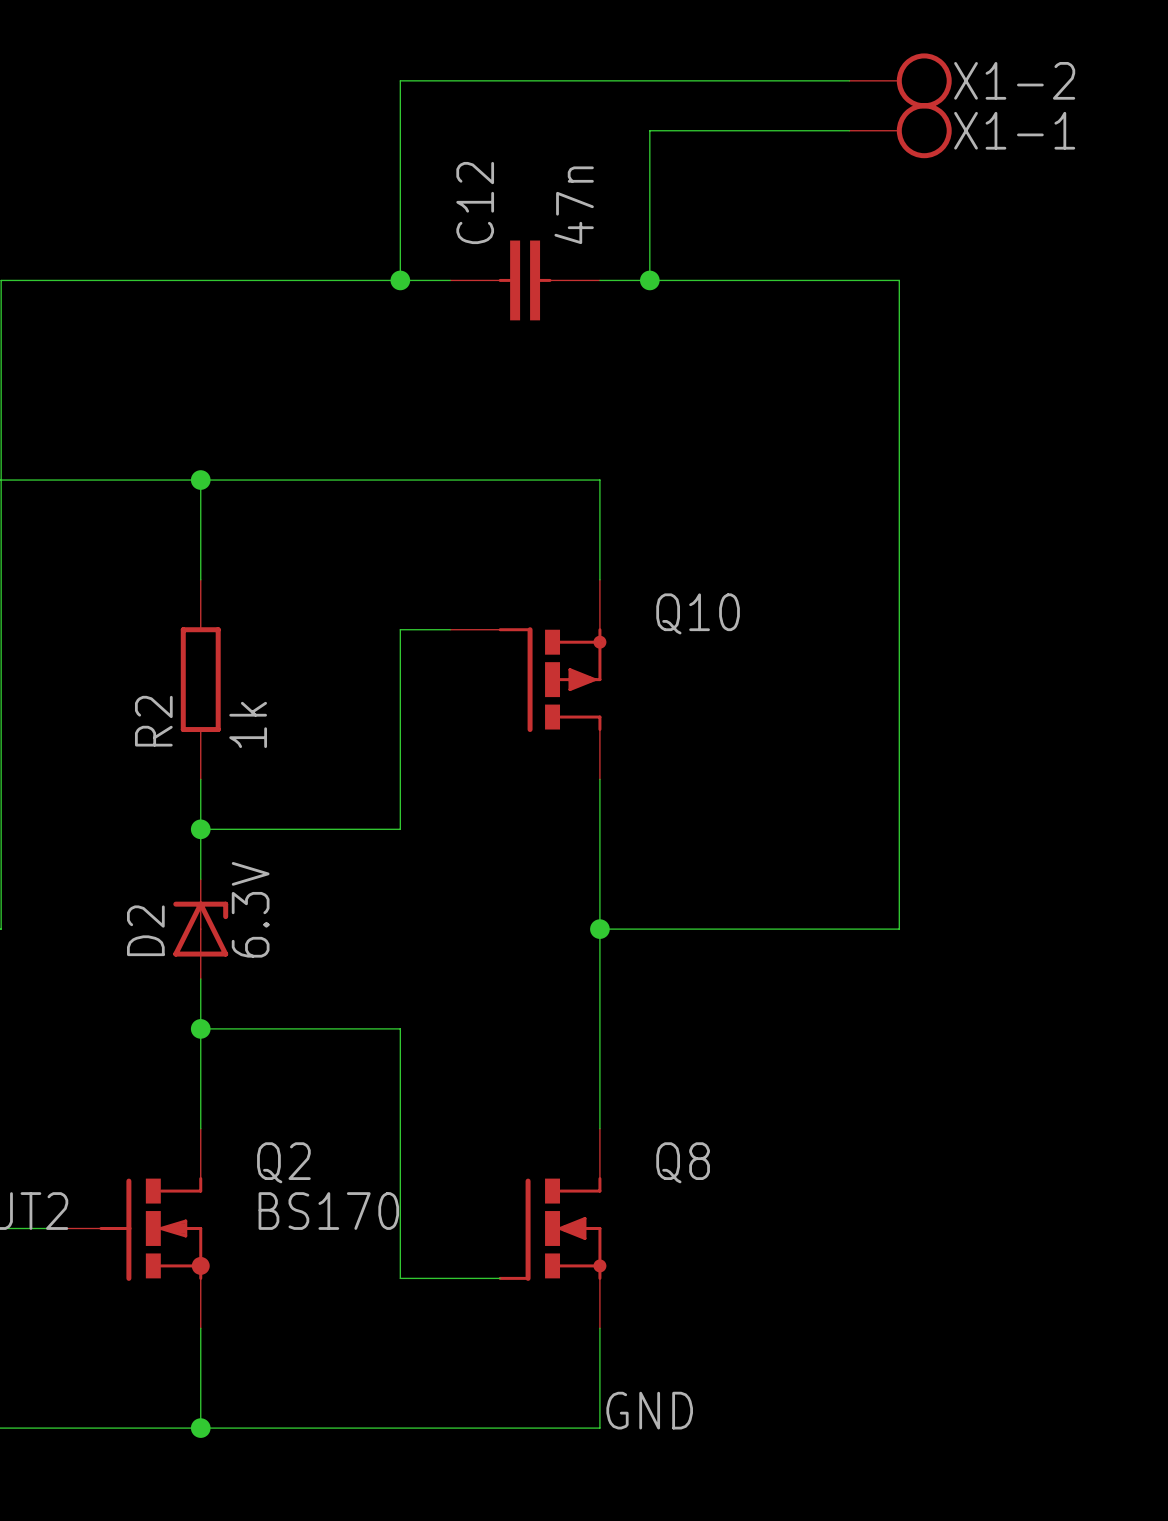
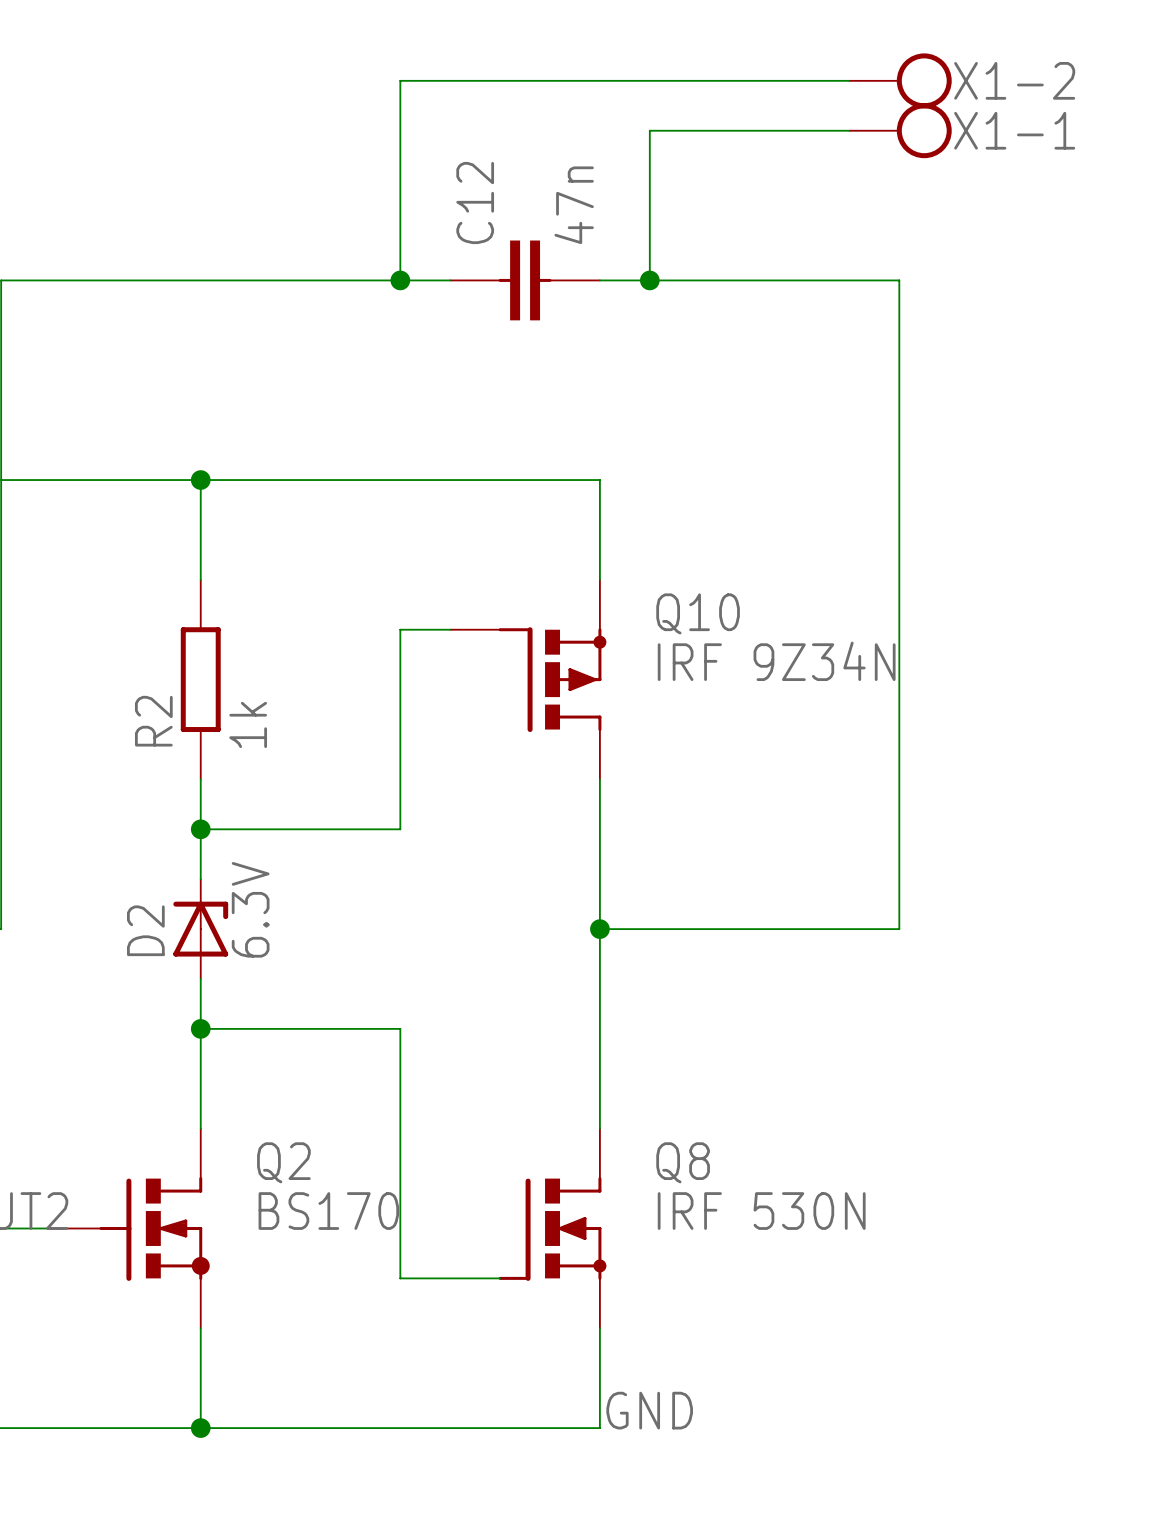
Q10 value: none -> IRF 9Z34N (776, 661)
Q8 value: none -> IRF 530N (761, 1211)

